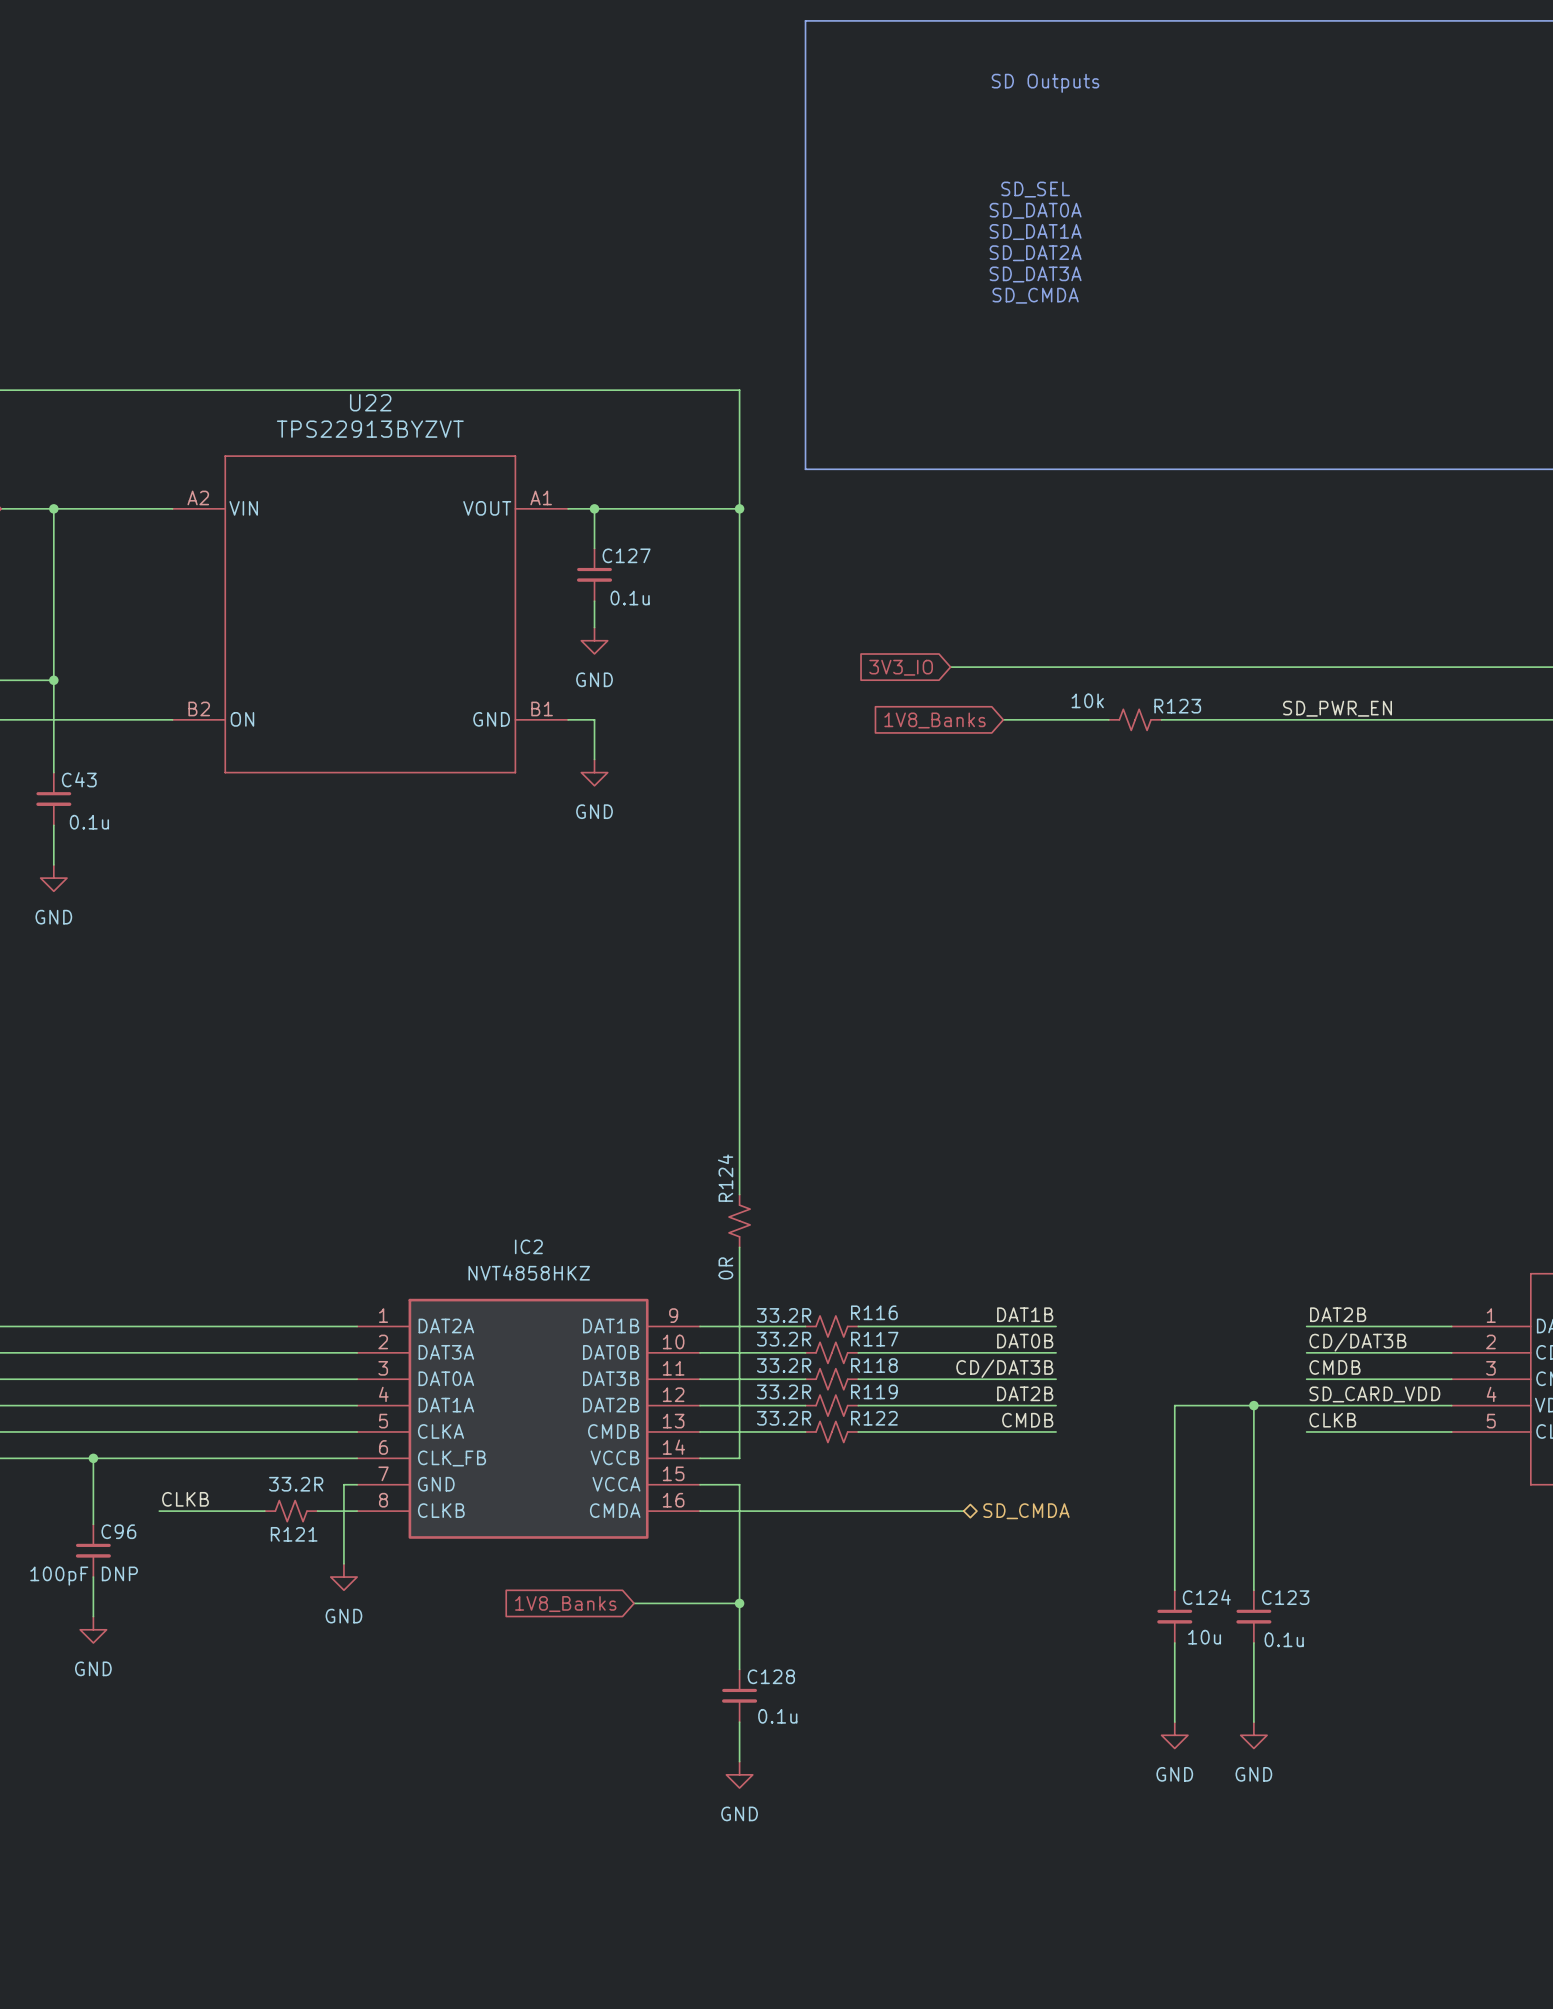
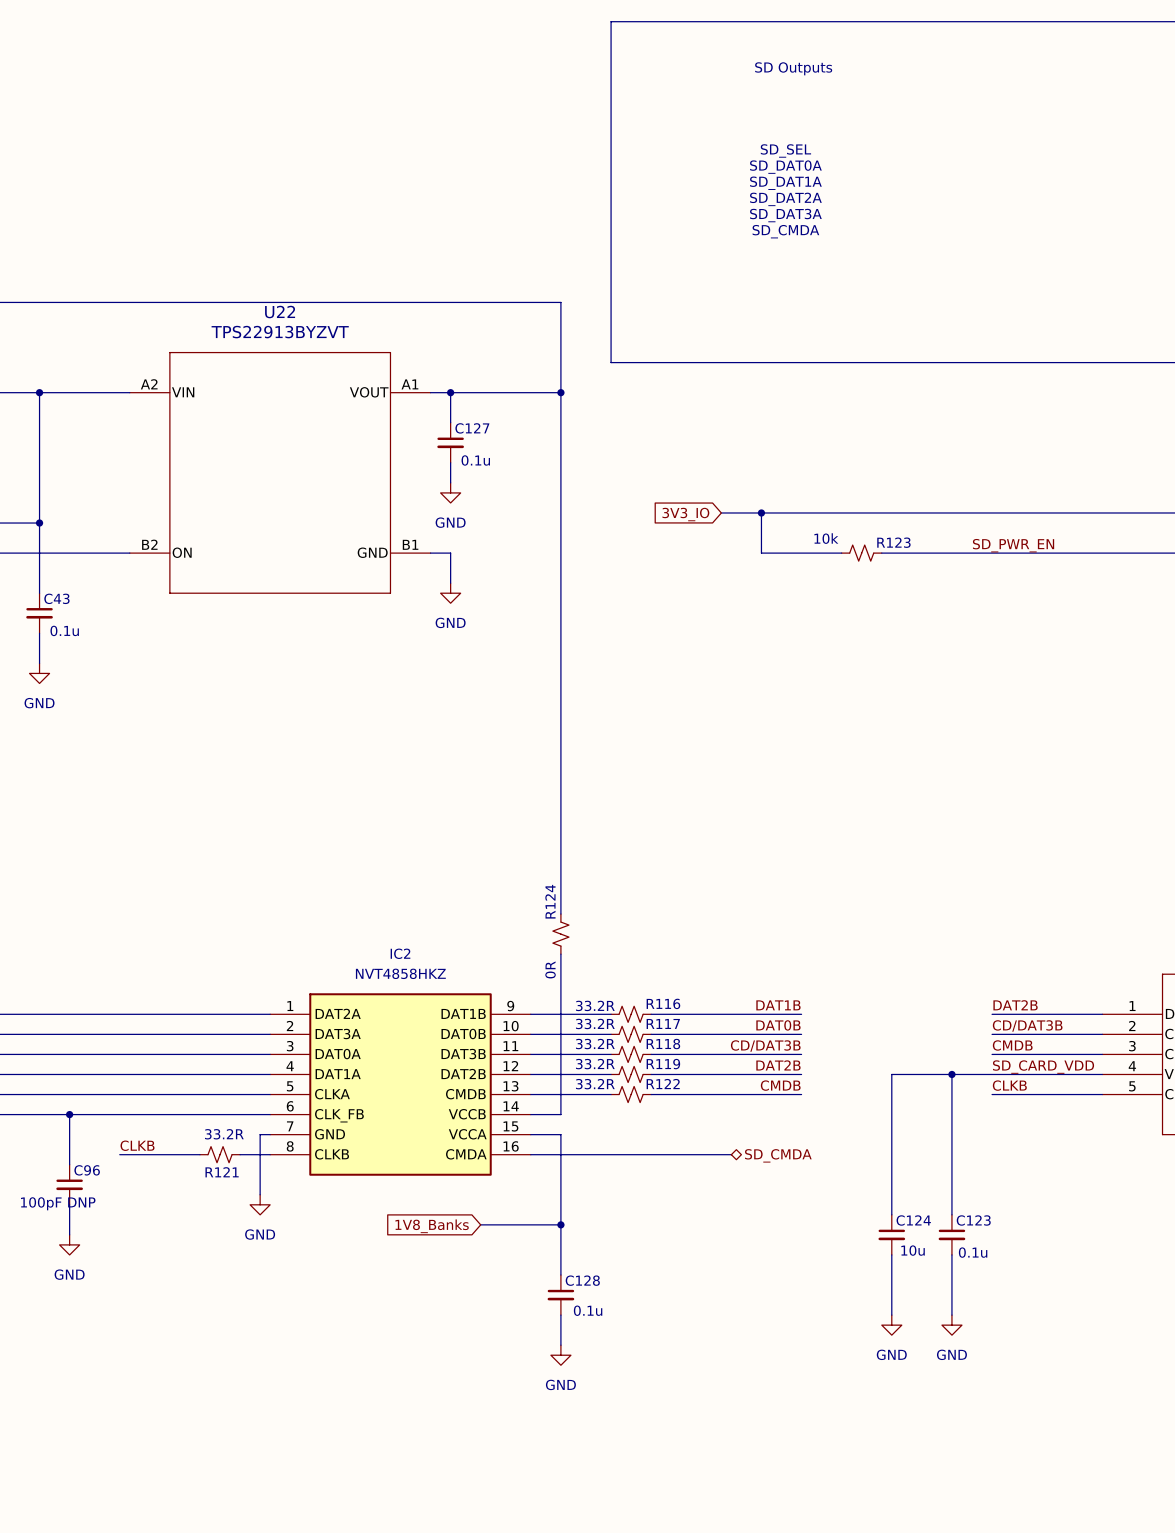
wire: none -> (761, 512) (761, 553)
junction: none -> (761, 512)
global label: 1V8_Banks (935, 720) -> none

